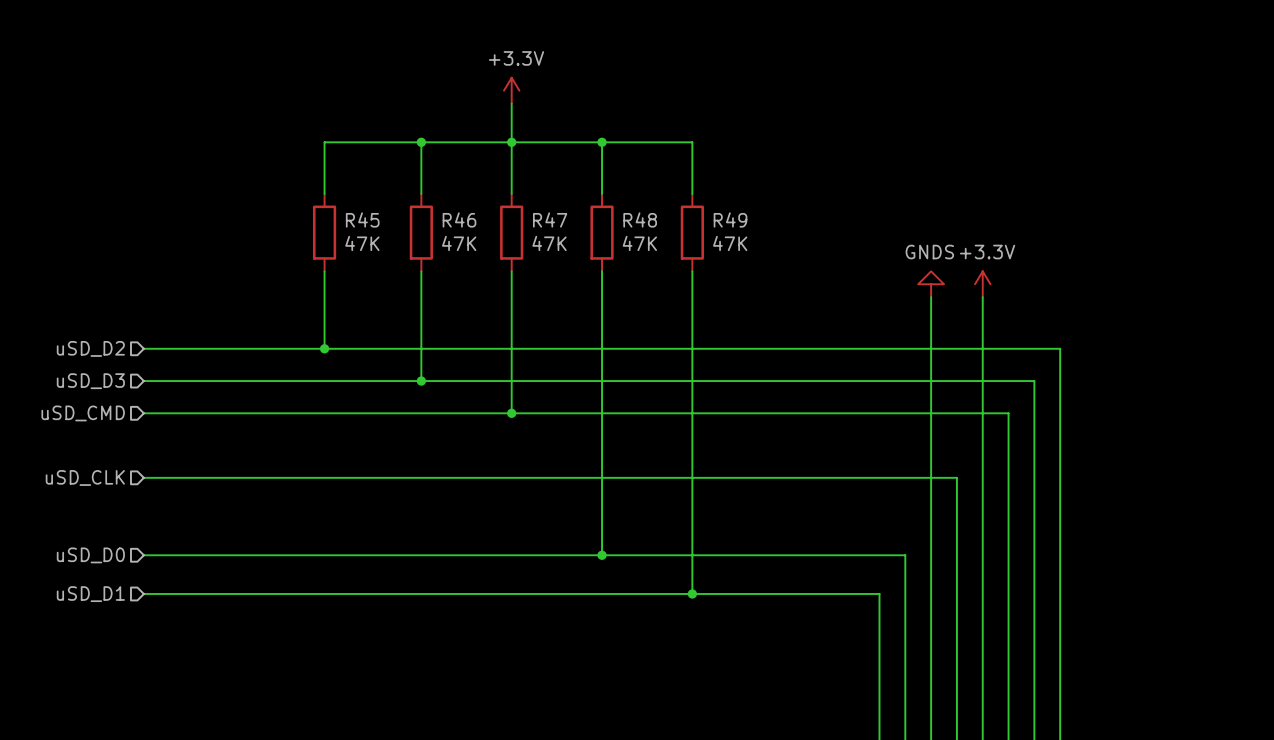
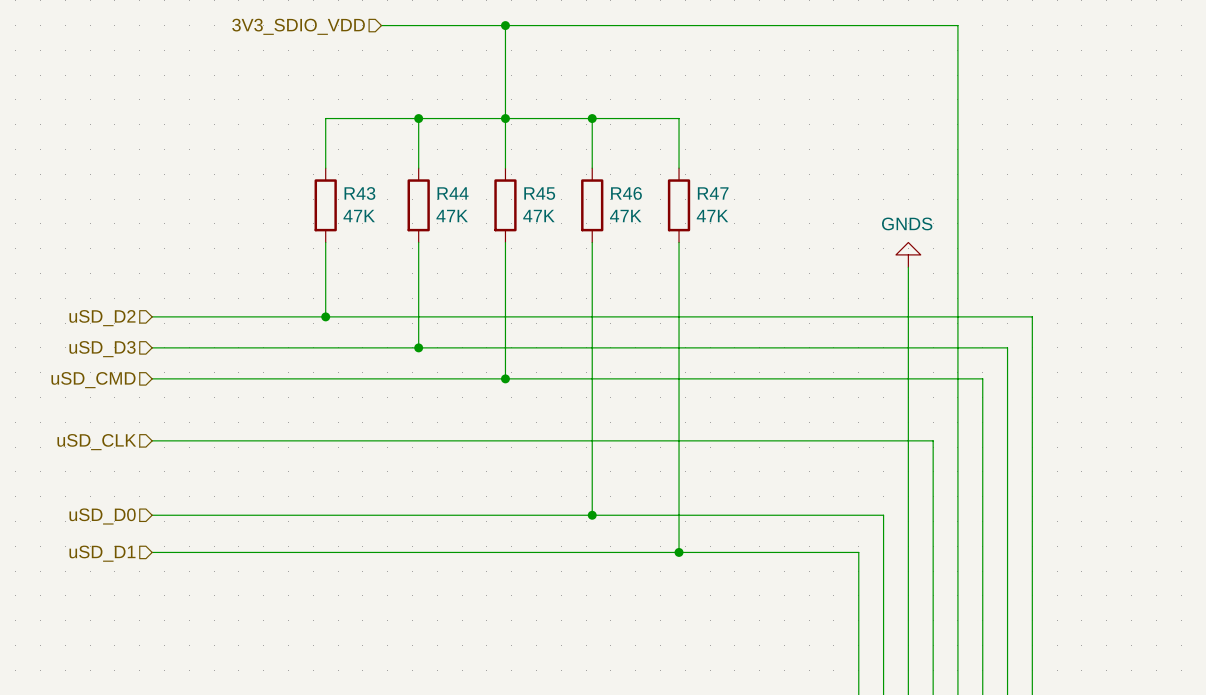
hierarchical label: none -> 3V3_SDIO_VDD (298, 26)
wire: none -> (381, 25) (957, 25) (957, 267)
wire: none -> (505, 25) (505, 81)
junction: none -> (505, 25)
power symbol: +3.3V (511, 90) -> none
R45 name: R45 (362, 219) -> R43 (359, 193)
R46 name: R46 (459, 219) -> R44 (453, 193)
R47 name: R47 (550, 219) -> R45 (539, 193)
R48 name: R48 (640, 219) -> R46 (626, 193)
R49 name: R49 (730, 219) -> R47 (713, 193)
power symbol: +3.3V (982, 284) -> none

